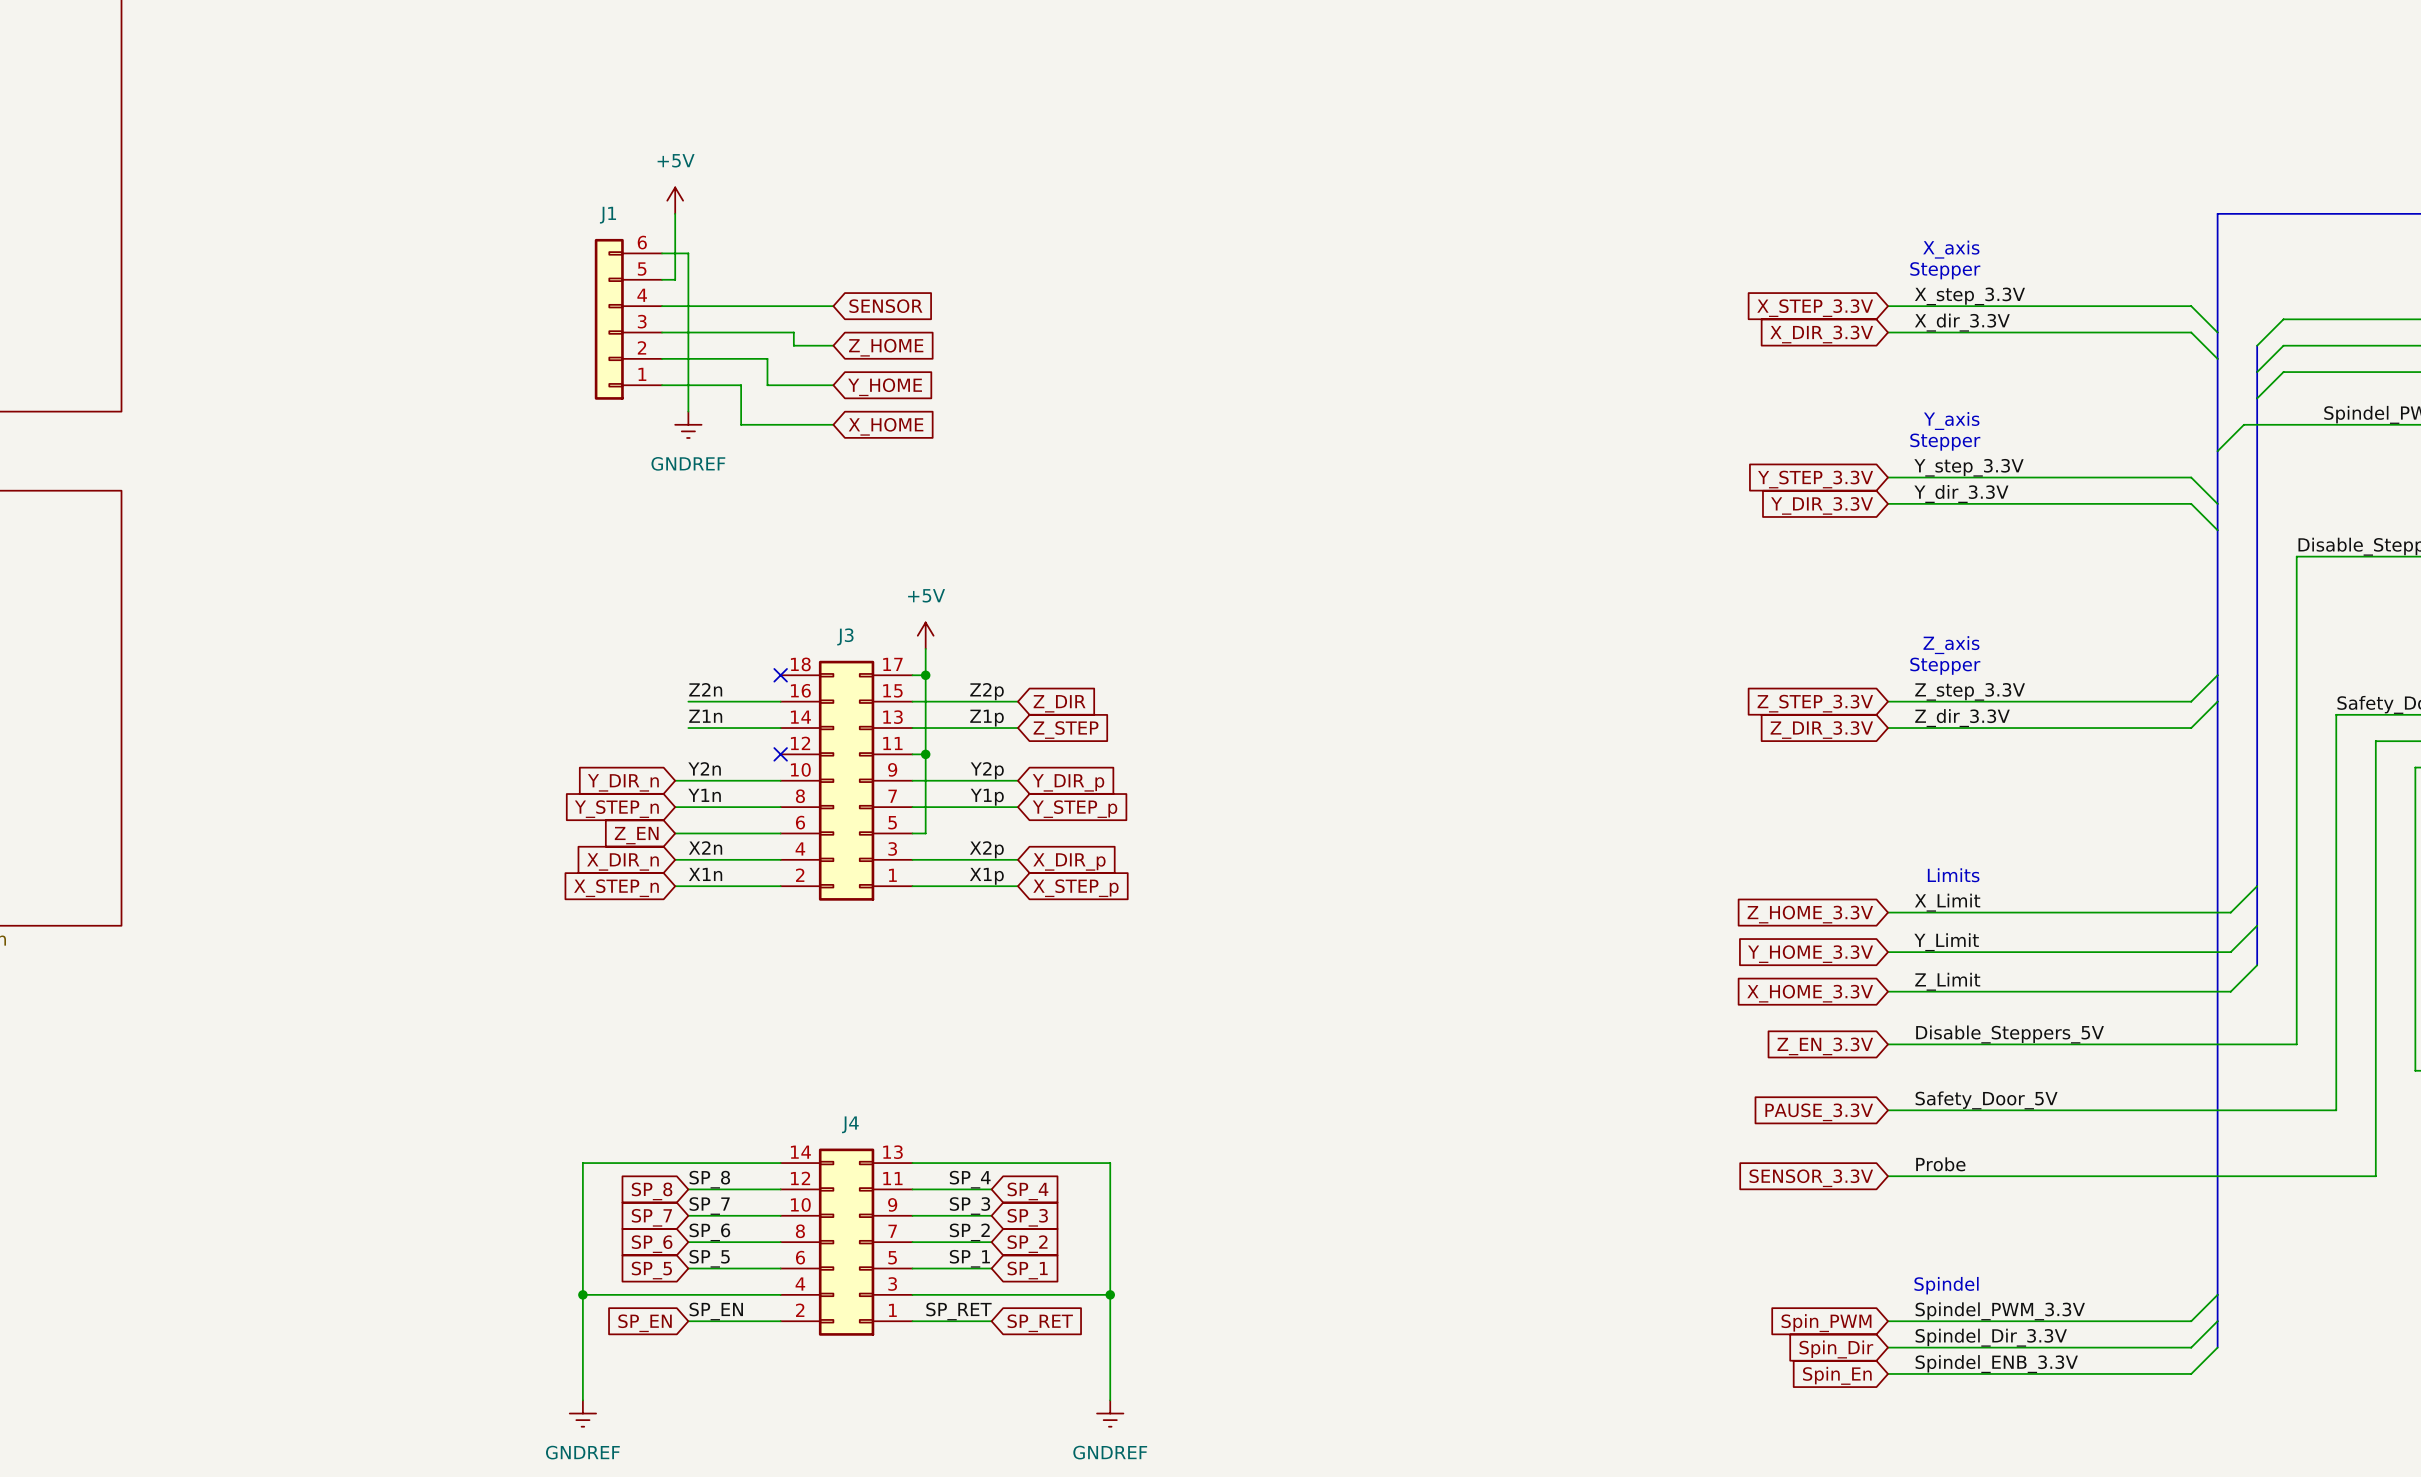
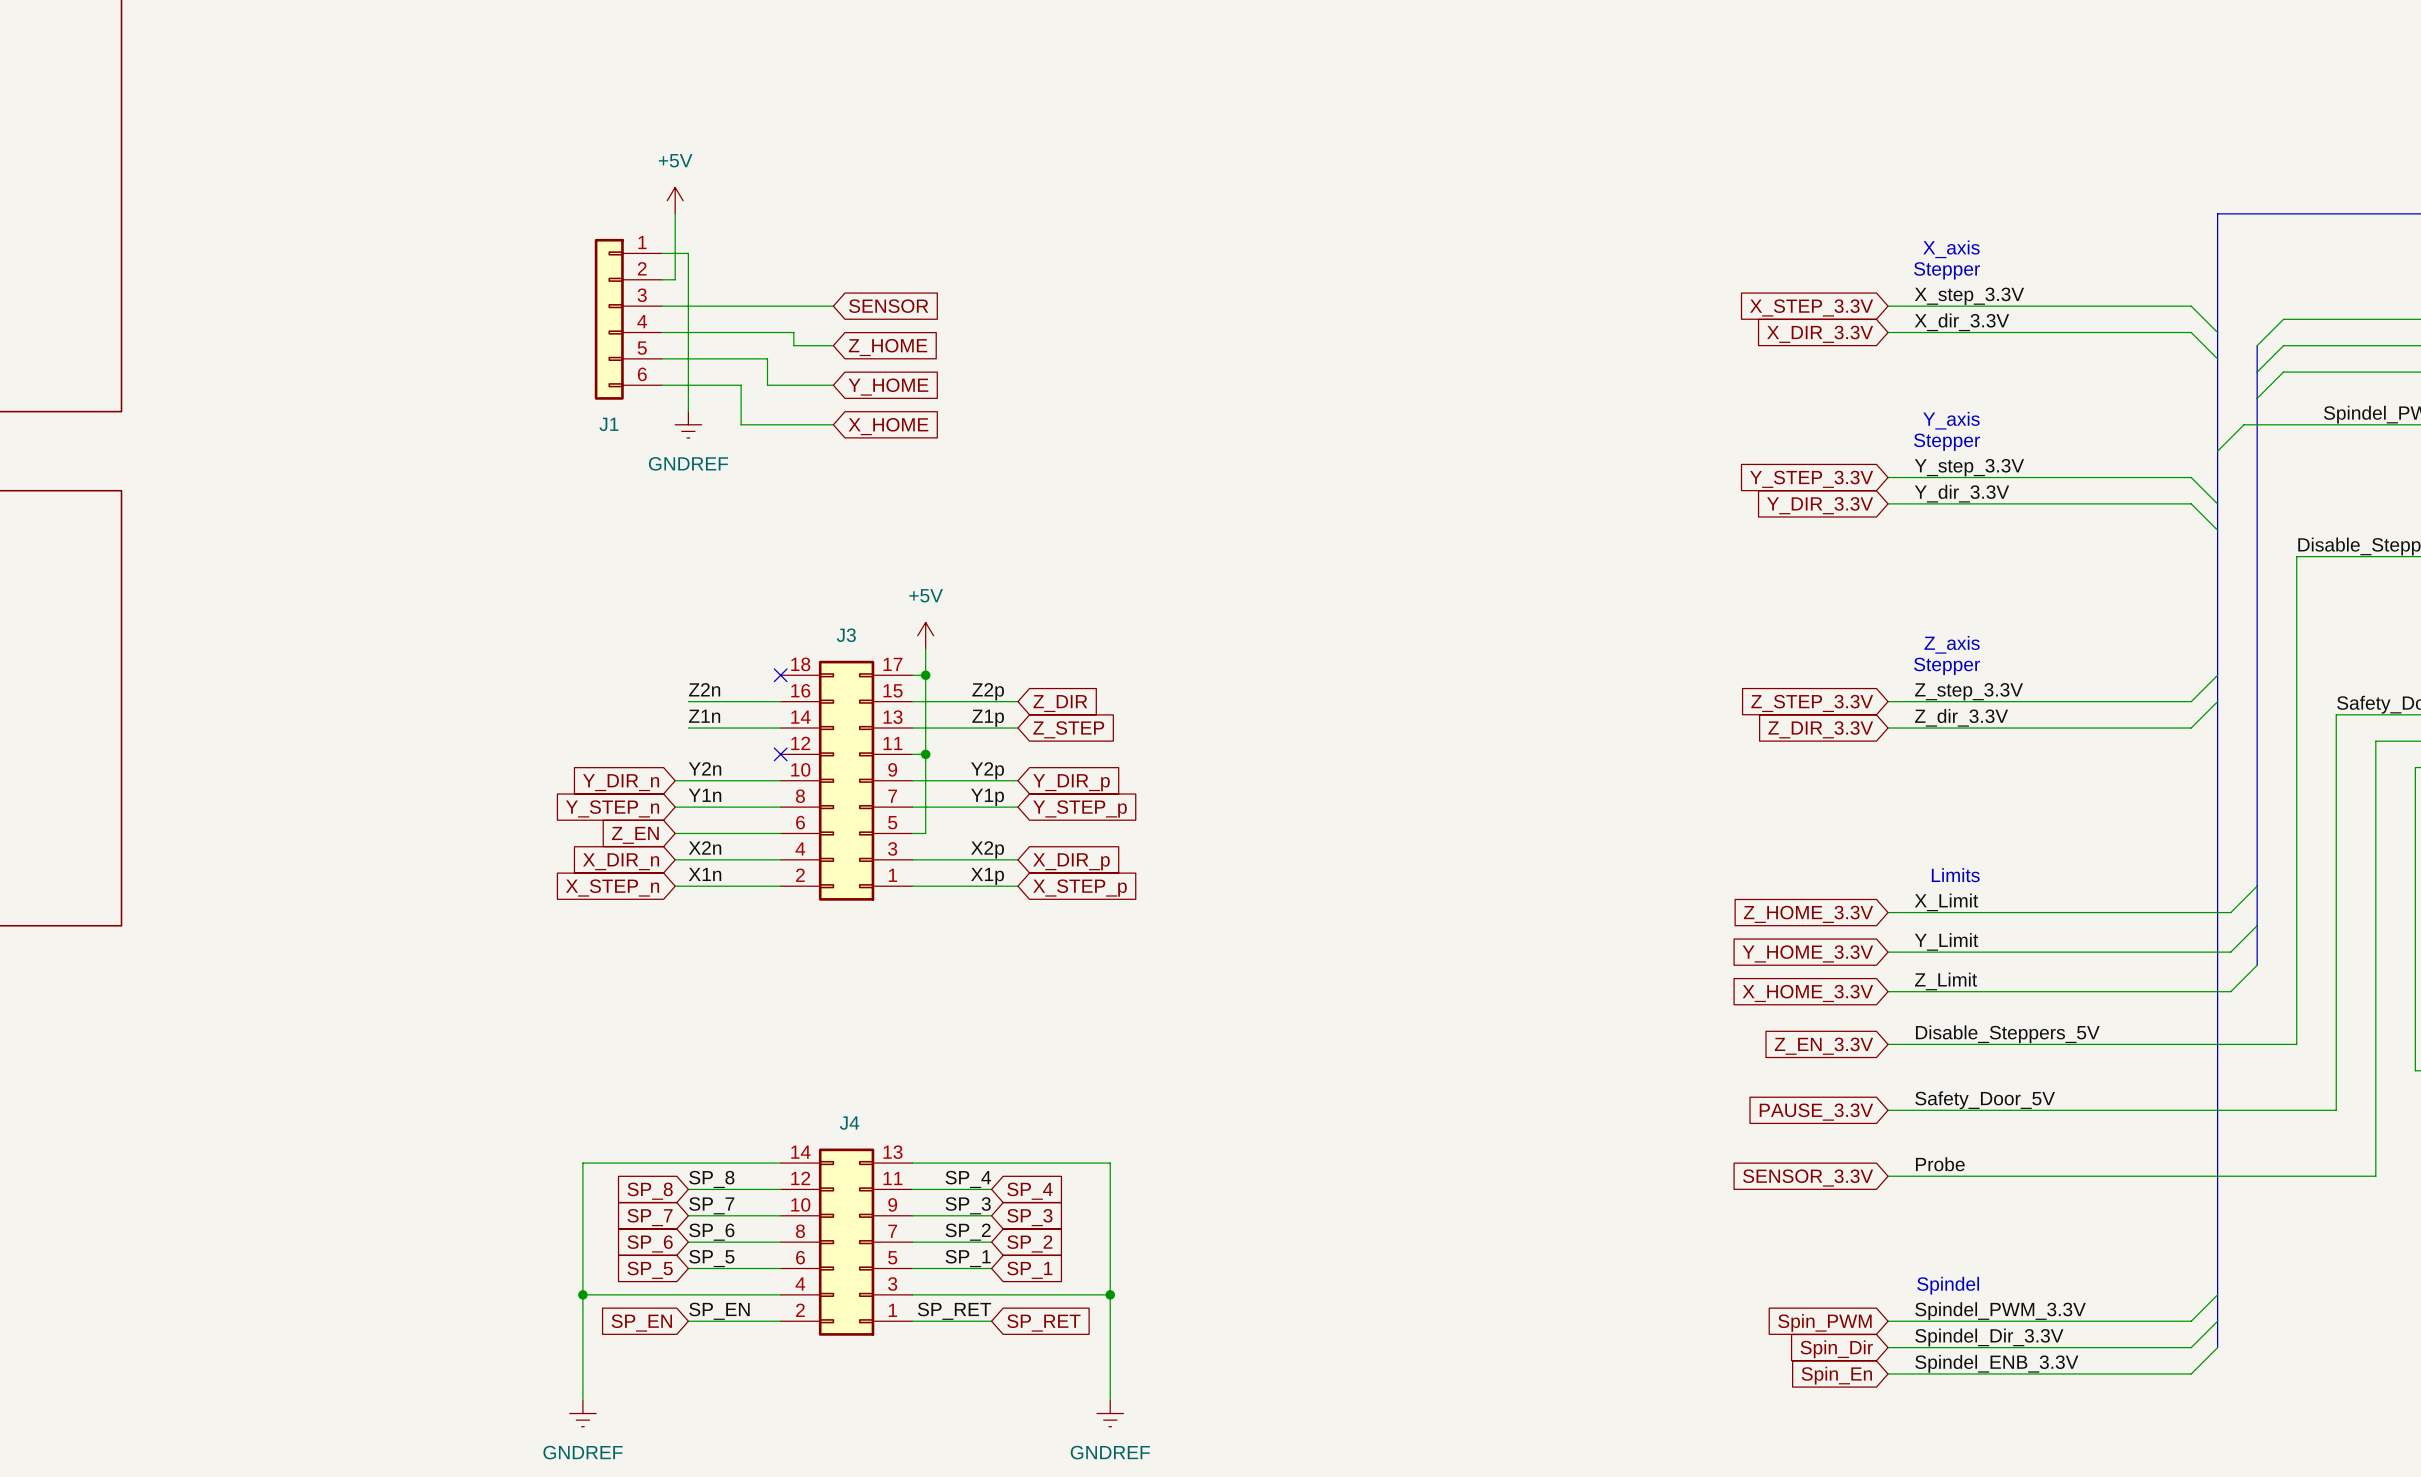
J1 flip: as is (609, 319) -> up-down (609, 319)

